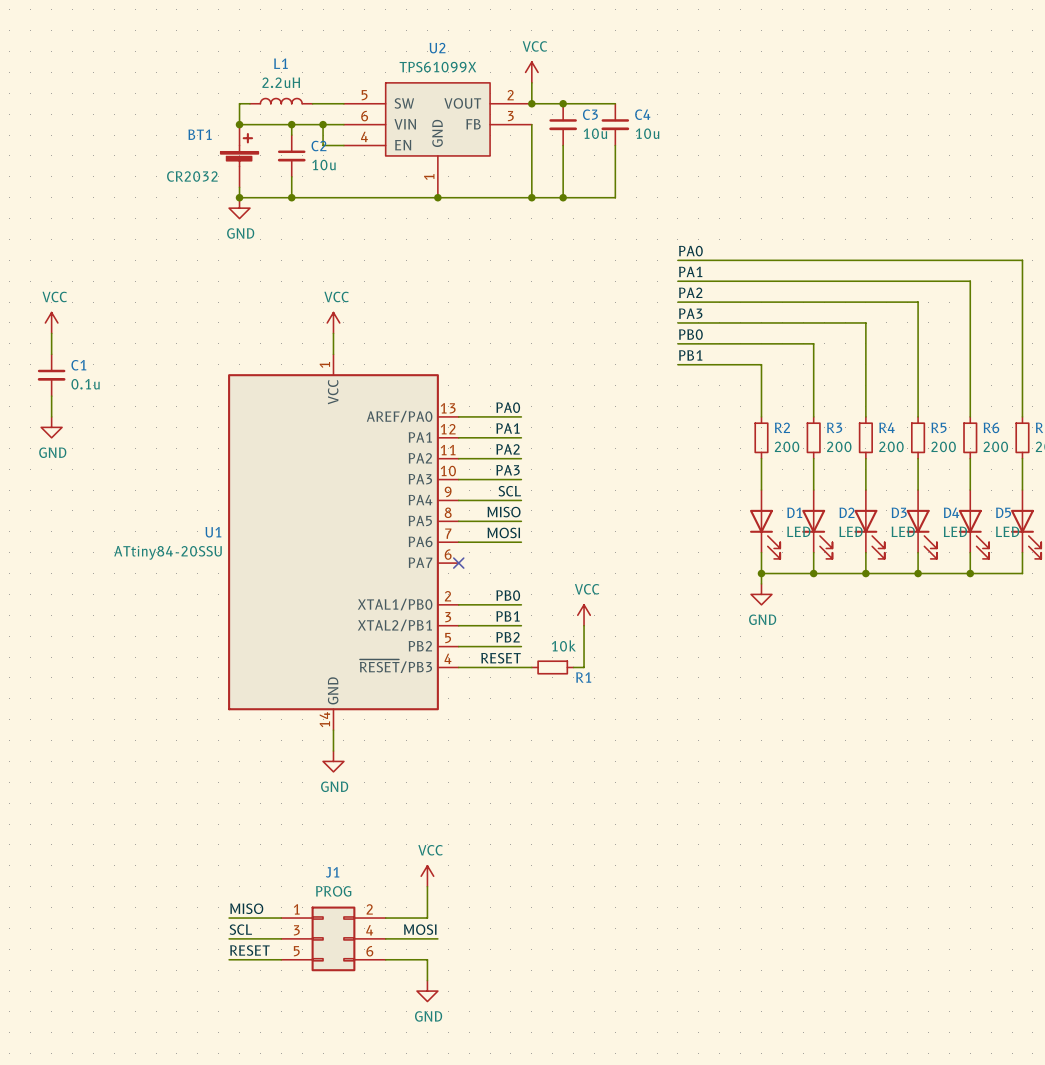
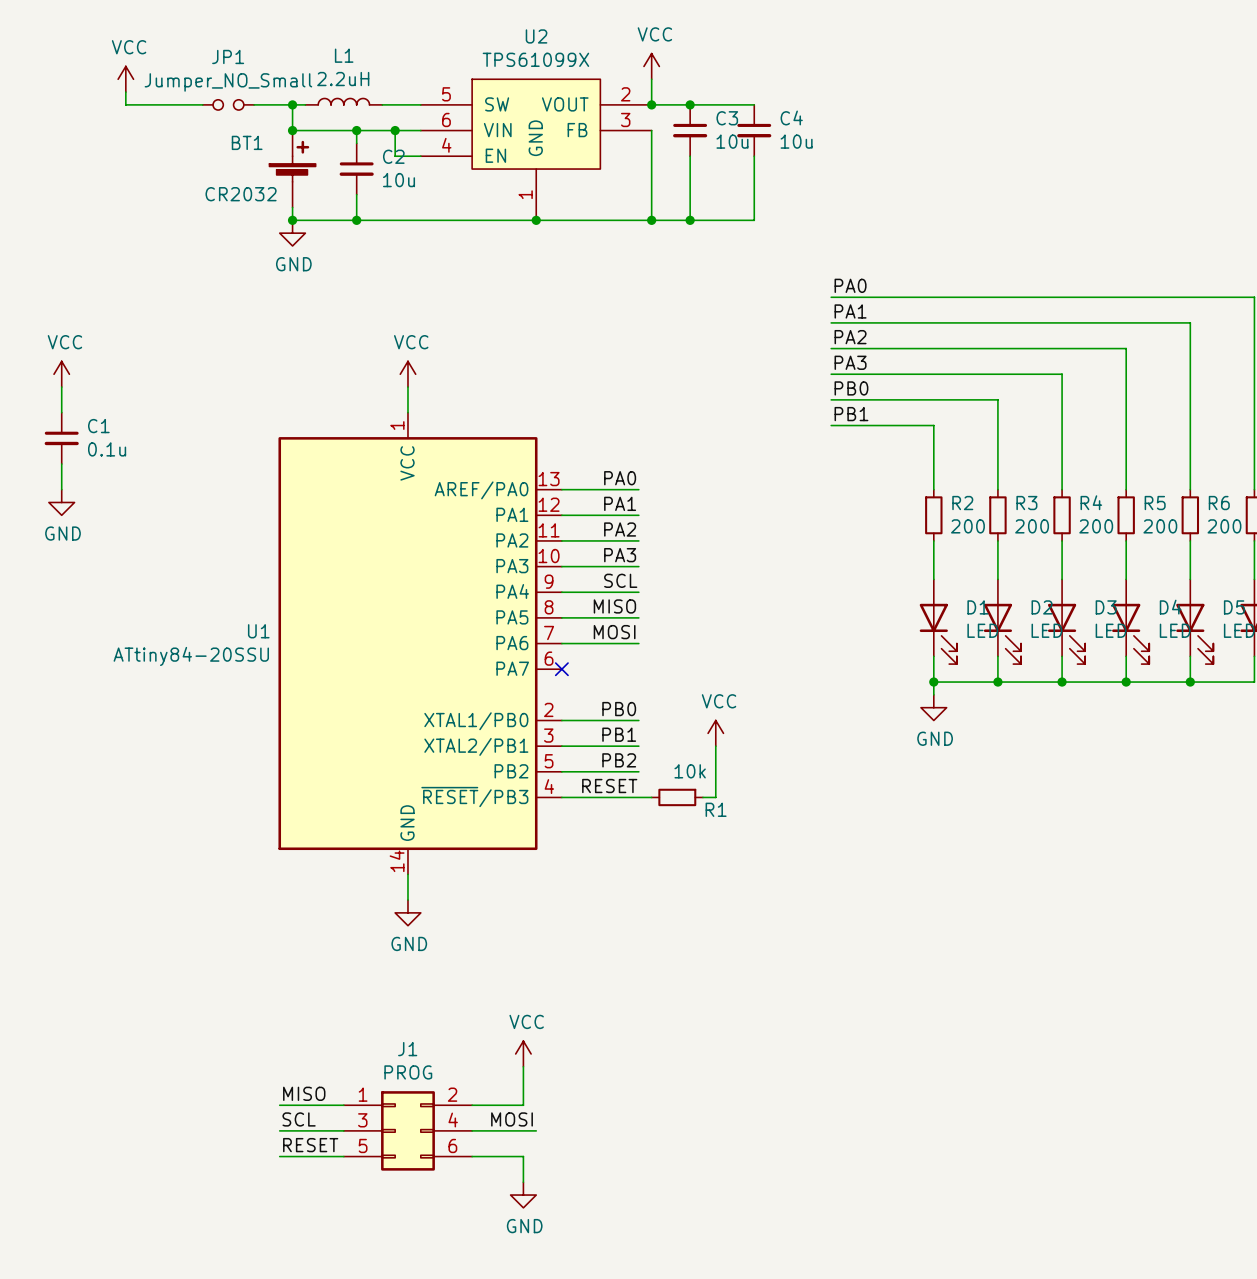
power symbol: none -> VCC (125, 79)
wire: none -> (125, 92) (125, 104) (202, 104)
JP1: none -> Jumper_NO_Small (228, 104)
wire: none -> (254, 104) (292, 104)
junction: none -> (292, 104)

